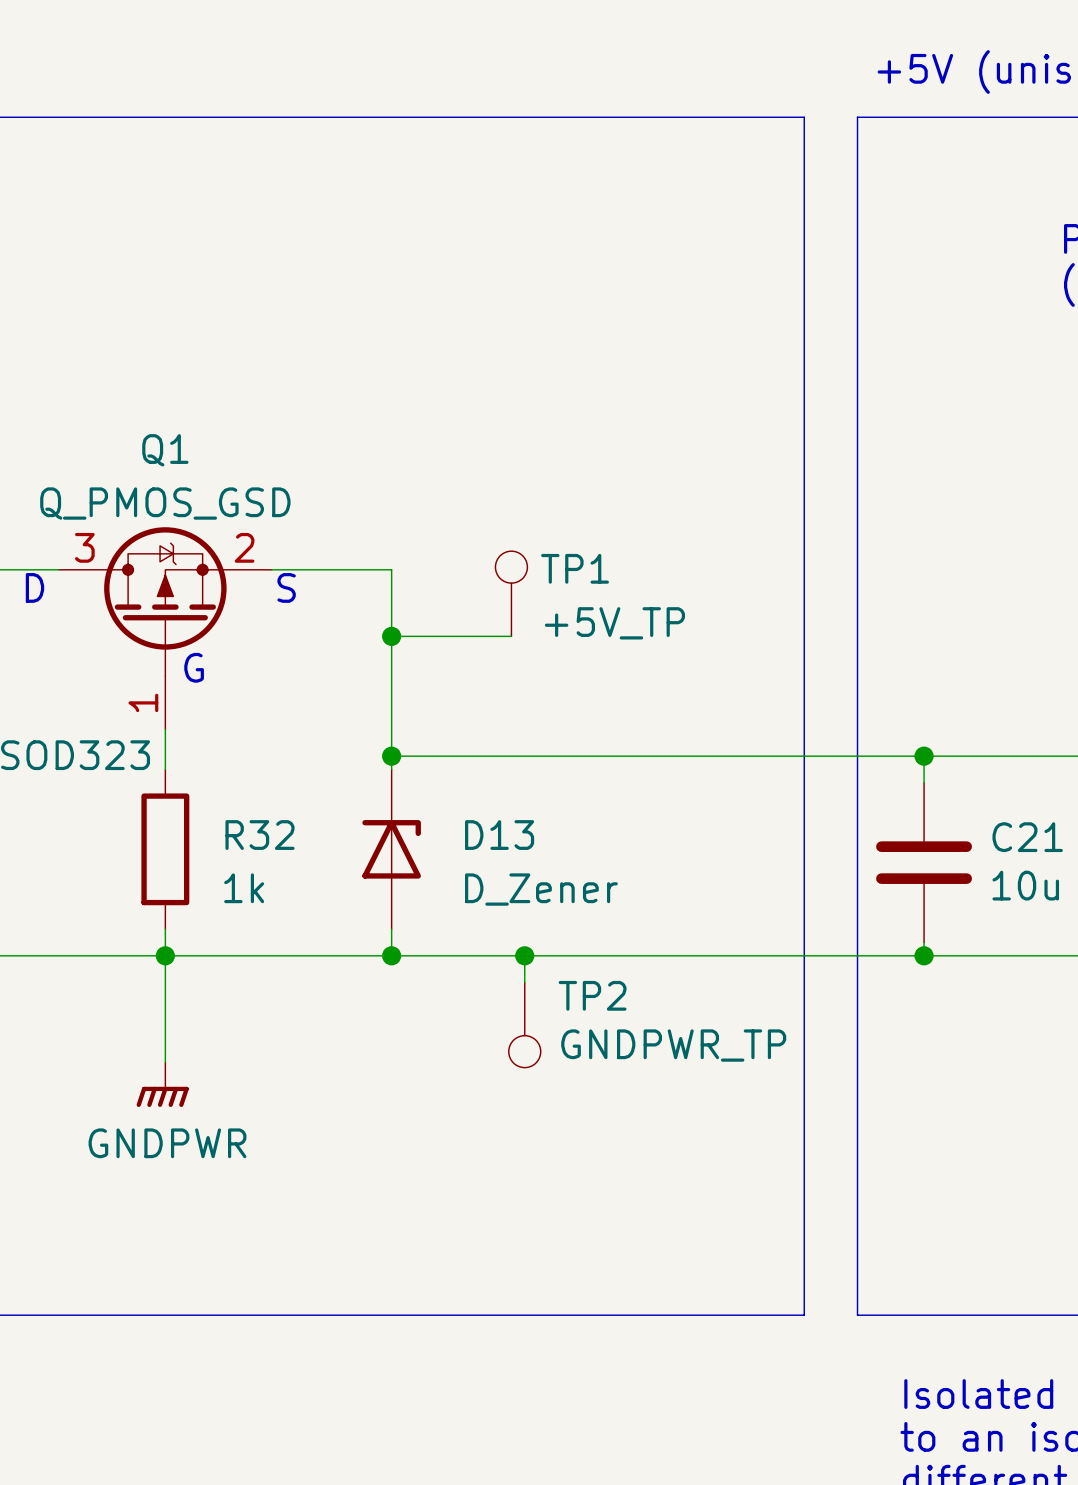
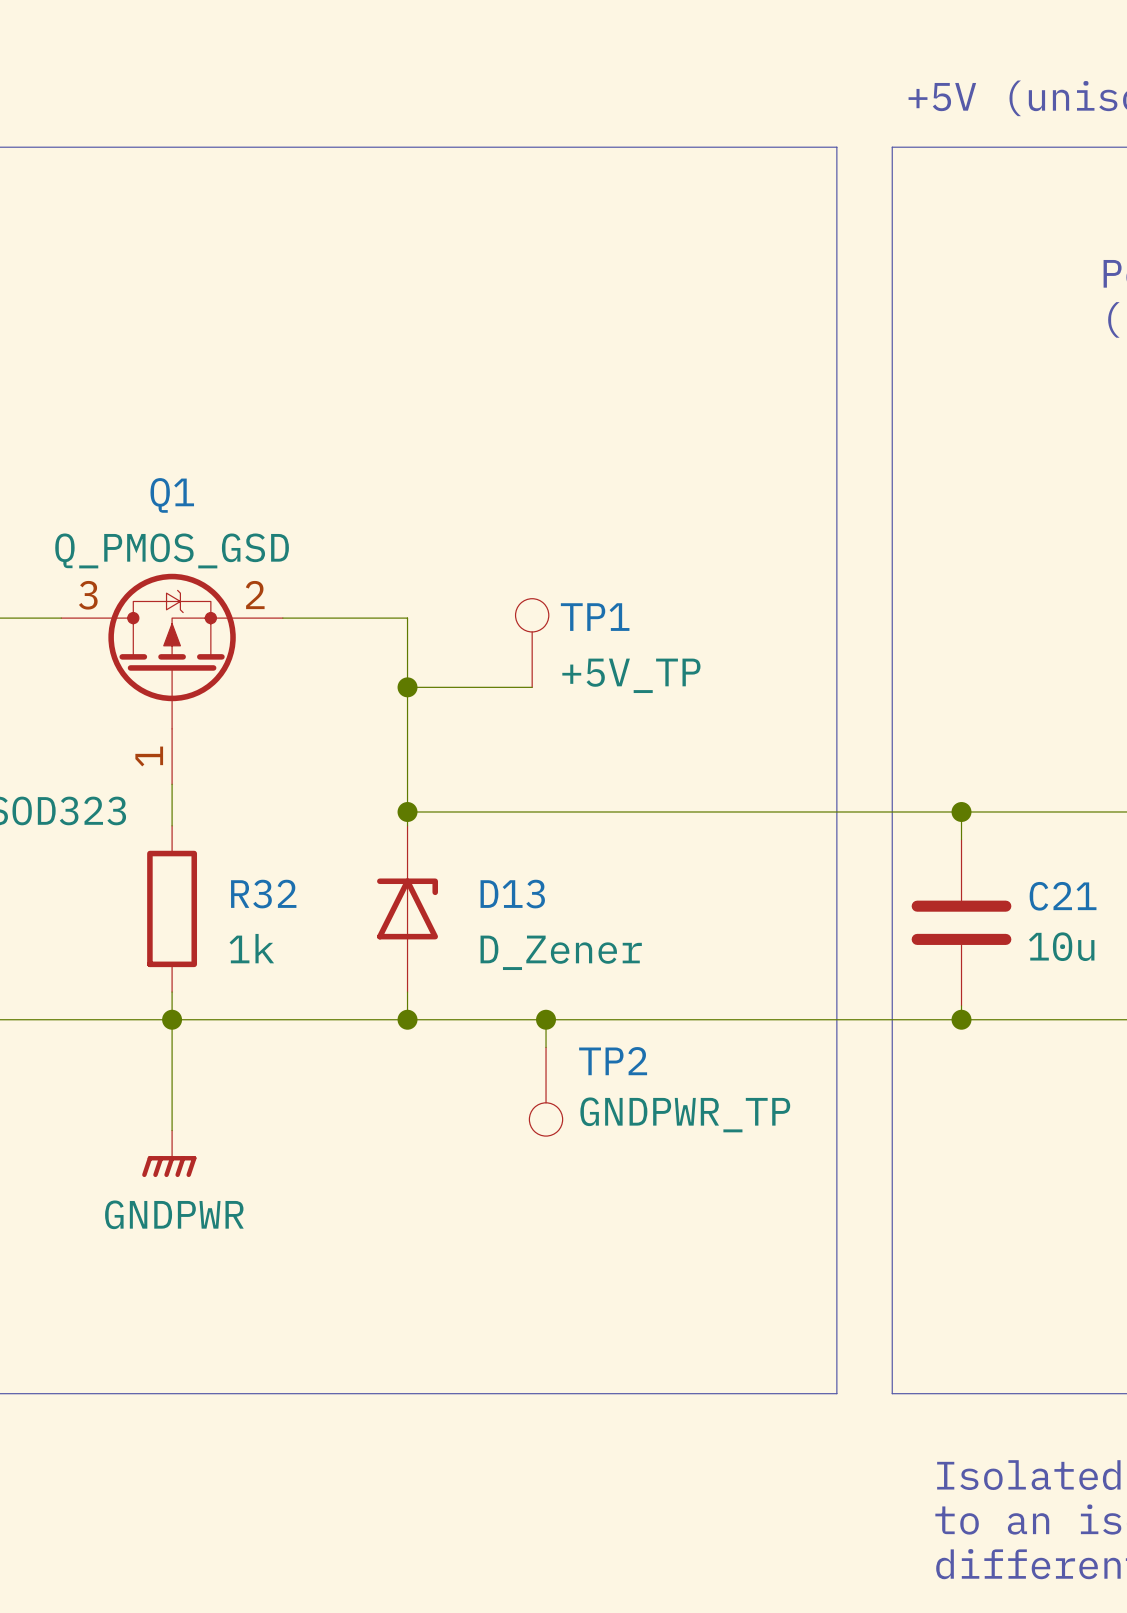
text: D (34, 587) -> none
text: S (286, 587) -> none
text: G (194, 667) -> none

